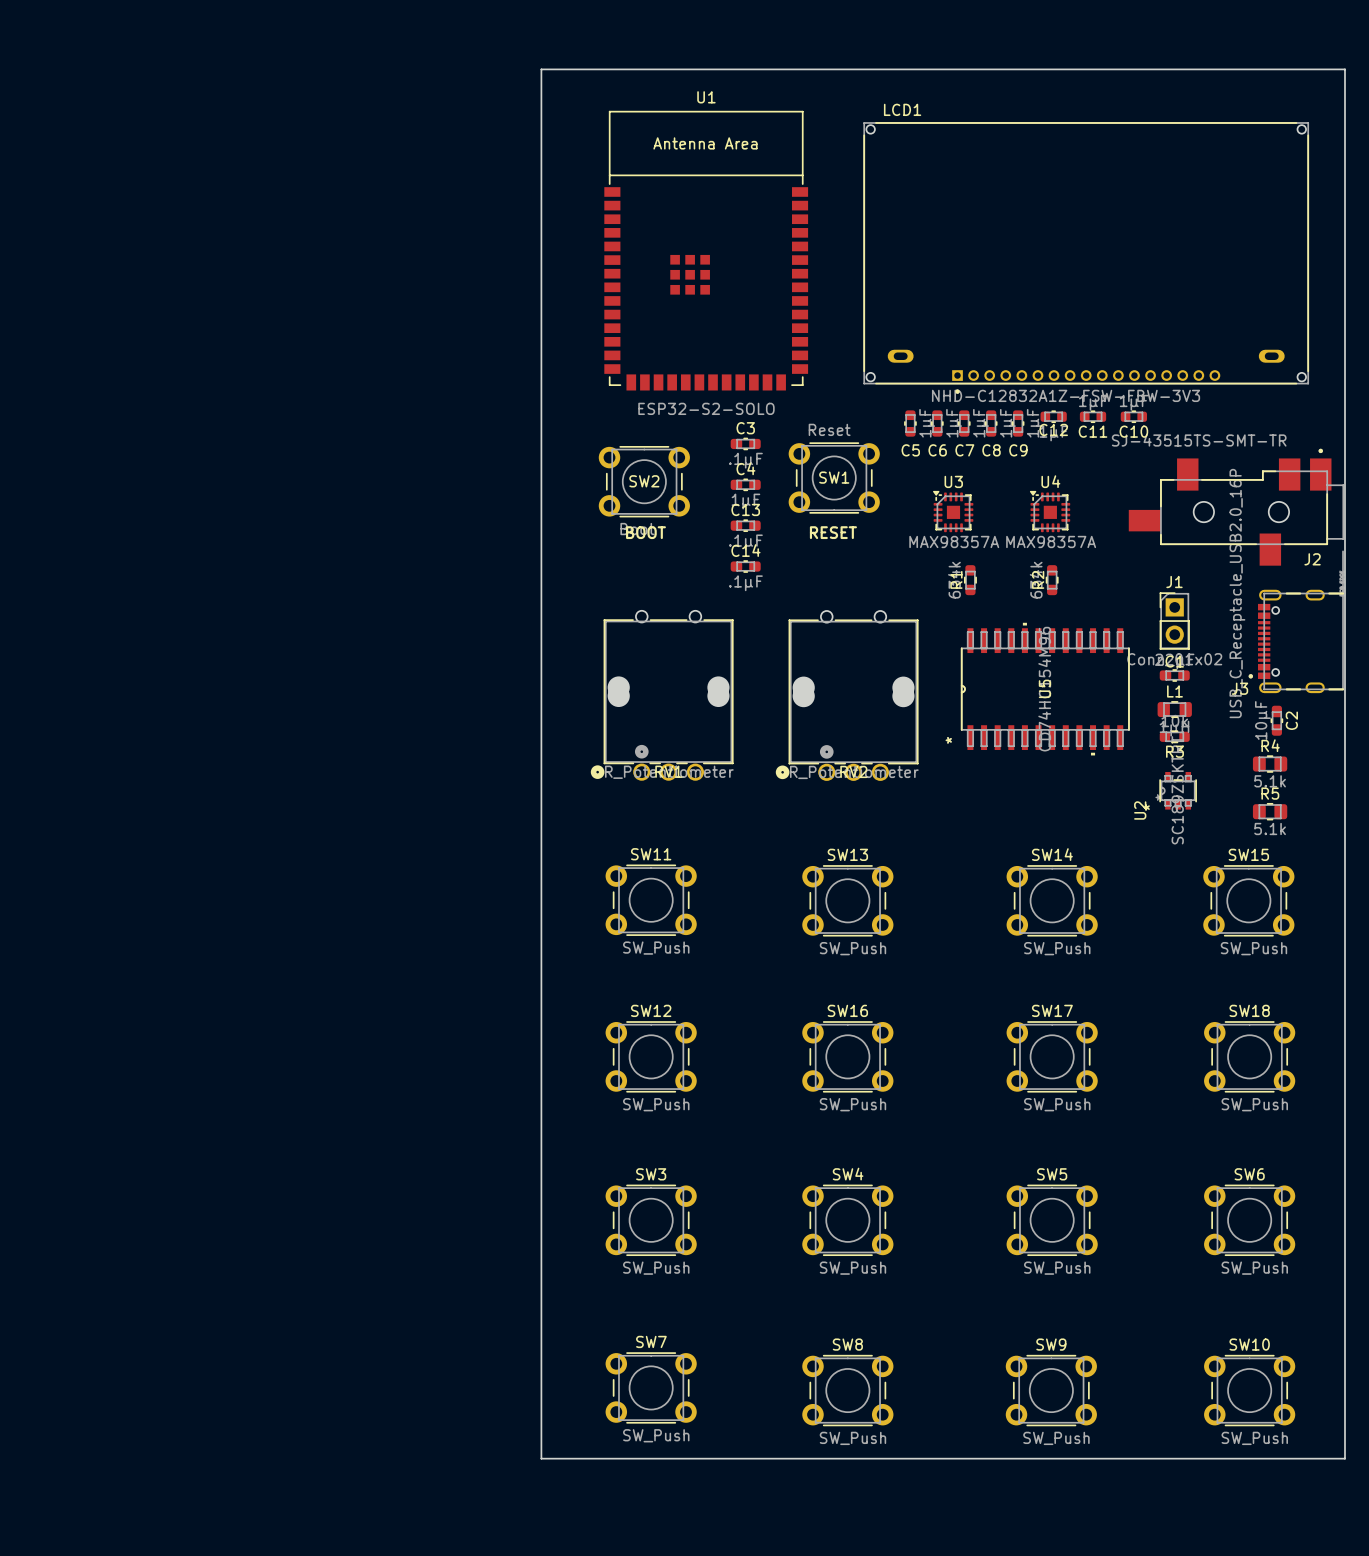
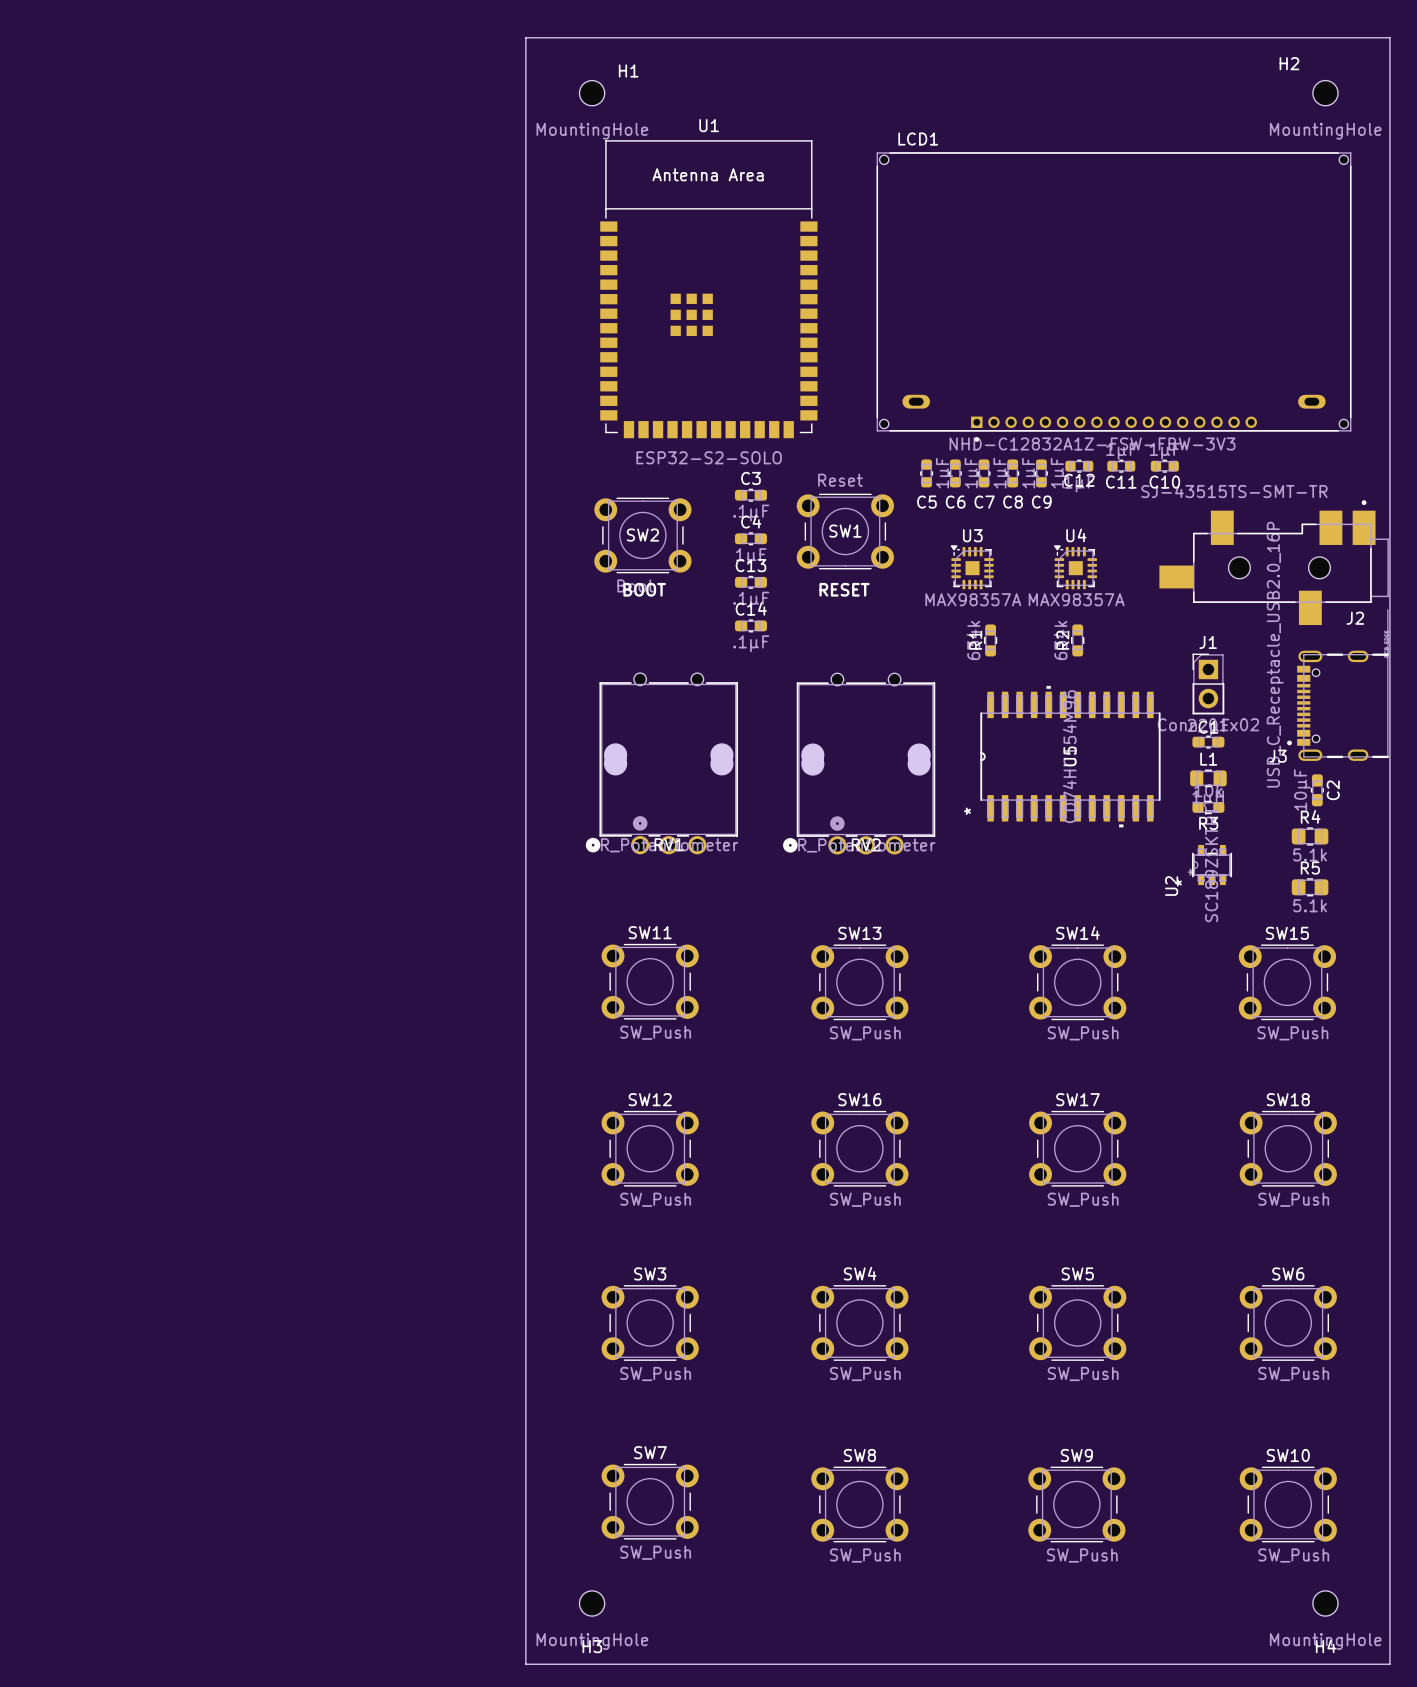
H1: none -> MountingHole (592, 93)
H2: none -> MountingHole (1325, 93)
board edge: (1344, 69) (541, 69) (541, 1458) (1344, 1458) -> (1389, 95) (1389, 37) (525, 37) (525, 1664) (1389, 1664) (1389, 1577)
H3: none -> MountingHole (592, 1603)
H4: none -> MountingHole (1325, 1603)

